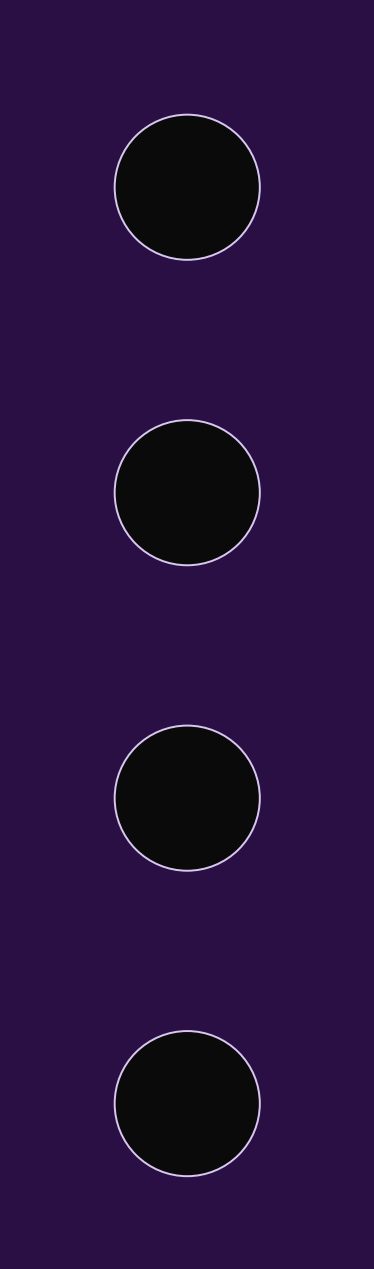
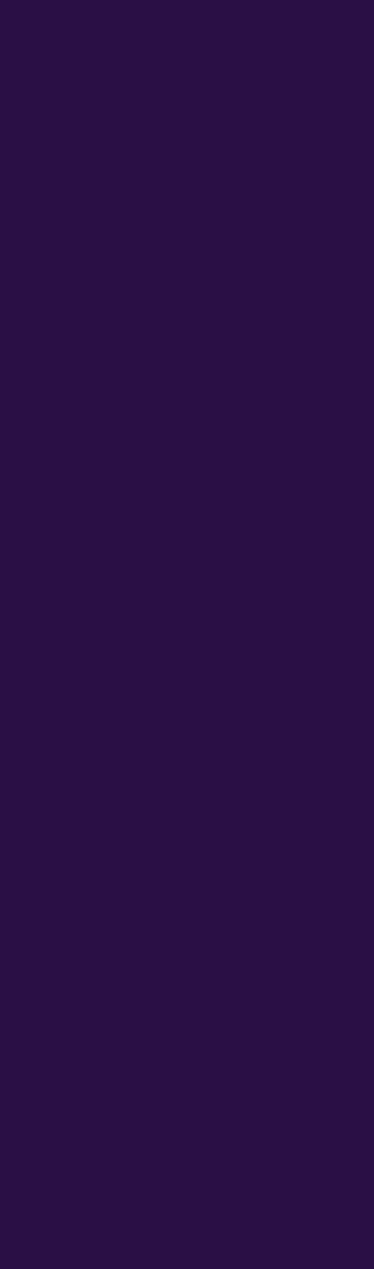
part: (187, 187) -> none
part: (187, 492) -> none
part: (187, 798) -> none
part: (187, 1103) -> none

